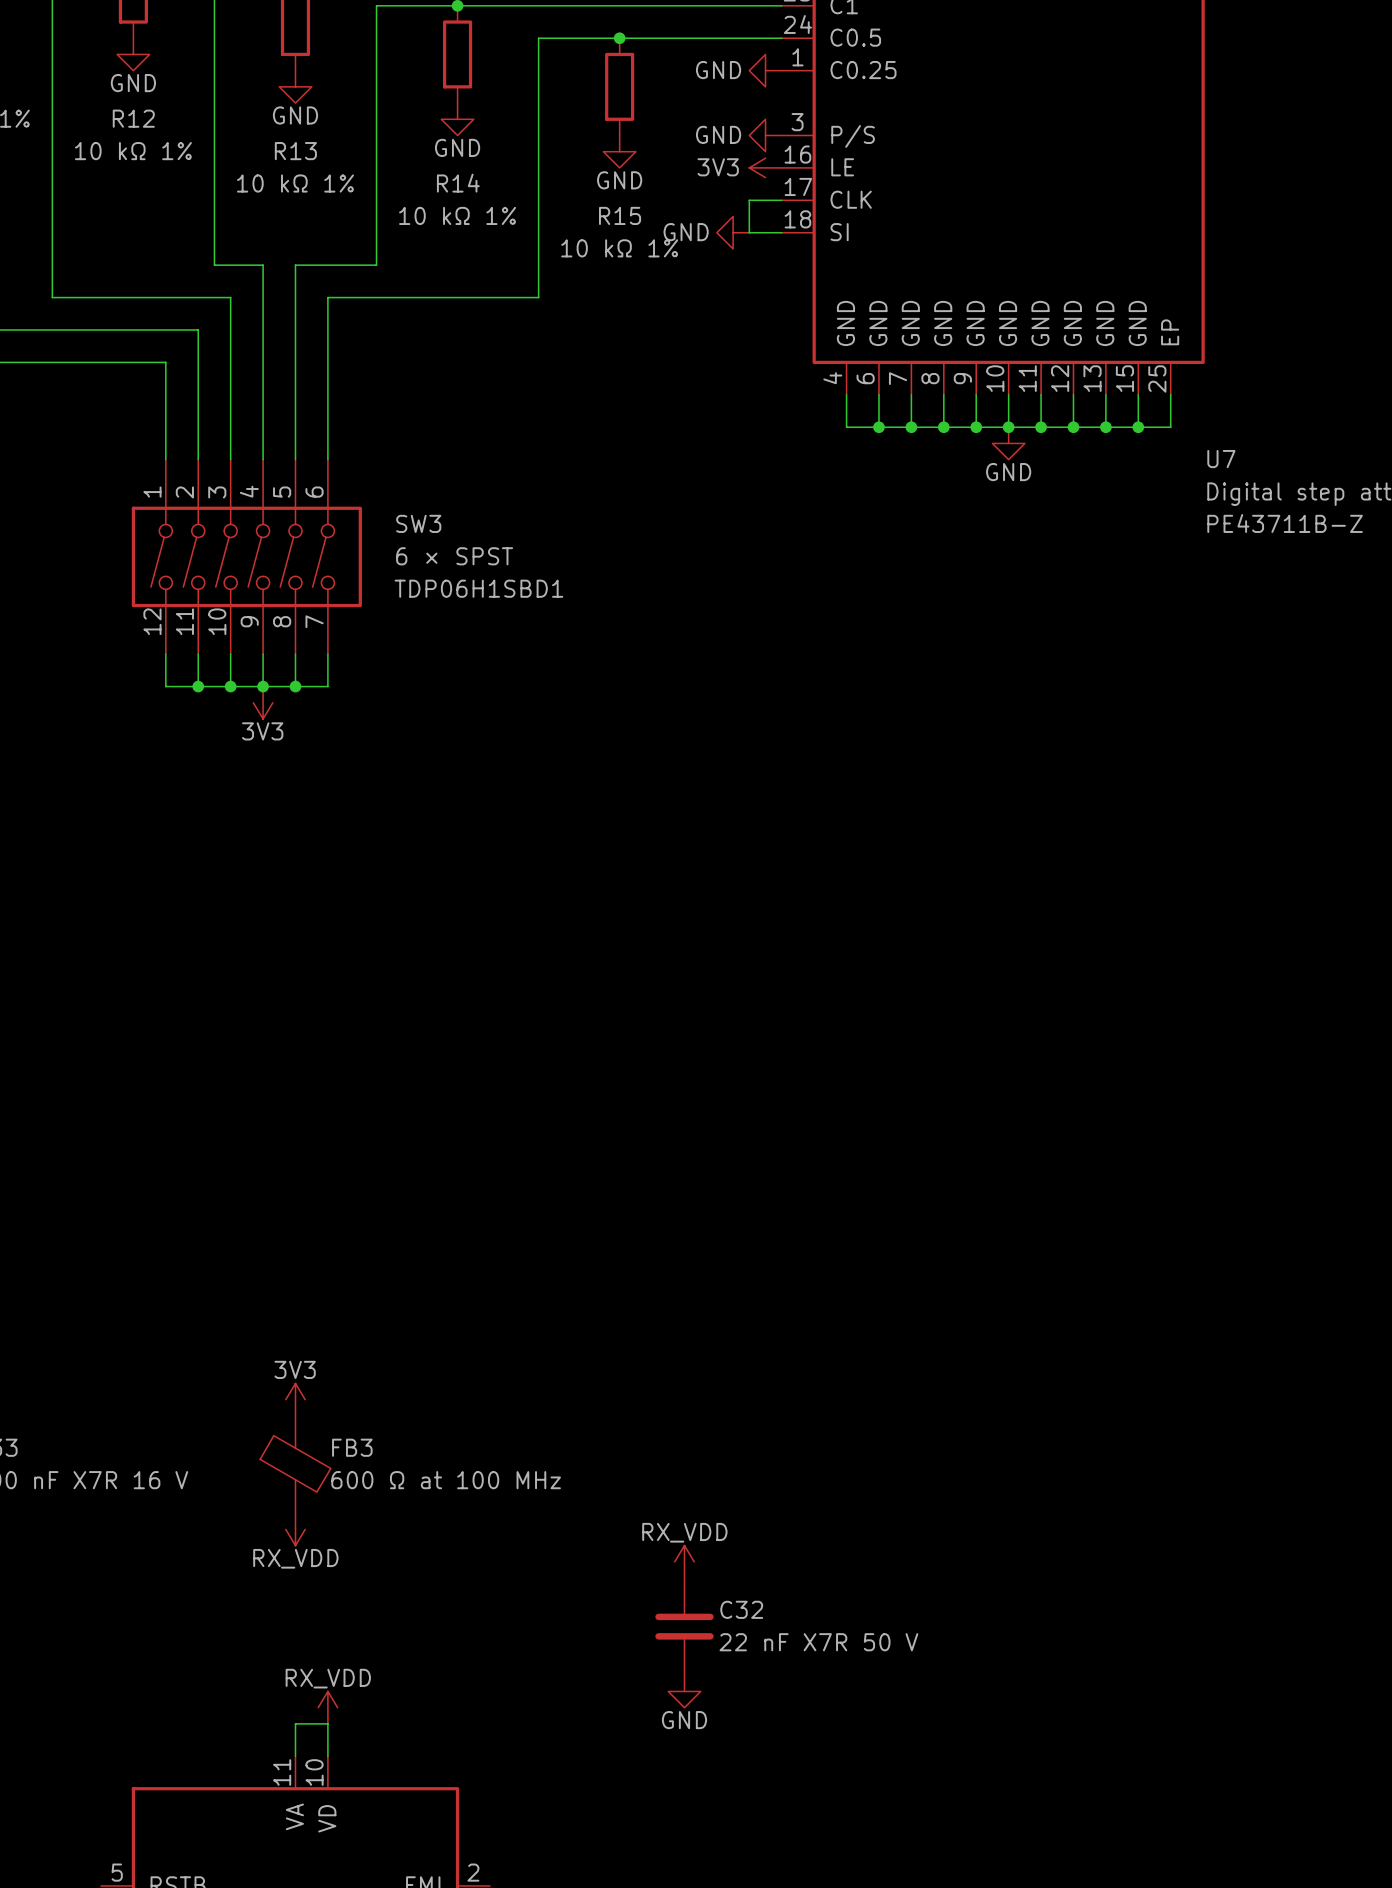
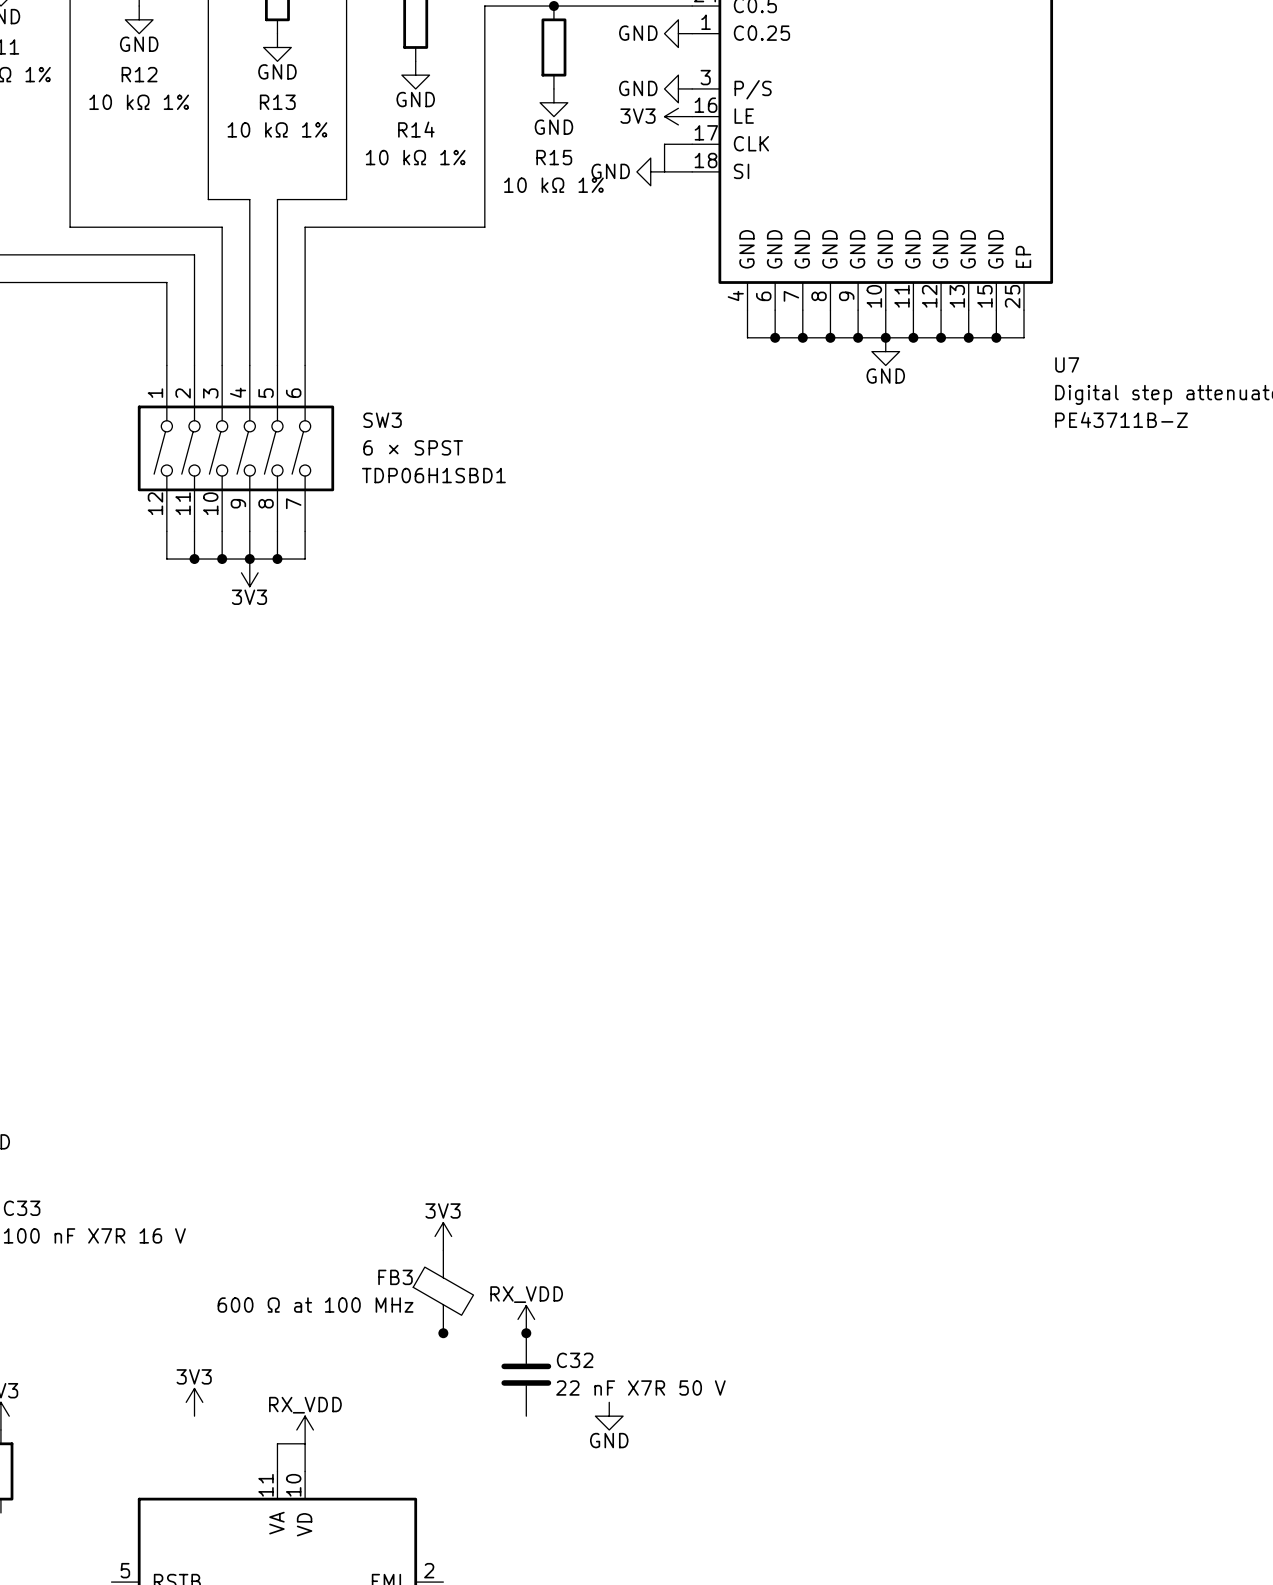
power symbol: 3V3 (295, 1399) -> none
FB3 name position: FB3 (352, 1447) -> FB3 (395, 1277)
FB3 position: (295, 1464) -> (443, 1291)
FB3 value position: 600 Ω at 100 MHz (446, 1480) -> 600 Ω at 100 MHz (315, 1305)
power symbol: none -> 3V3 (443, 1236)
power symbol: RX_VDD (295, 1529) -> none
power symbol position: RX_VDD (684, 1561) -> RX_VDD (526, 1319)
junction: none -> (443, 1333)
junction: none -> (526, 1333)
C32 position: (684, 1626) -> (526, 1374)
power symbol: none -> 3V3 (194, 1402)

